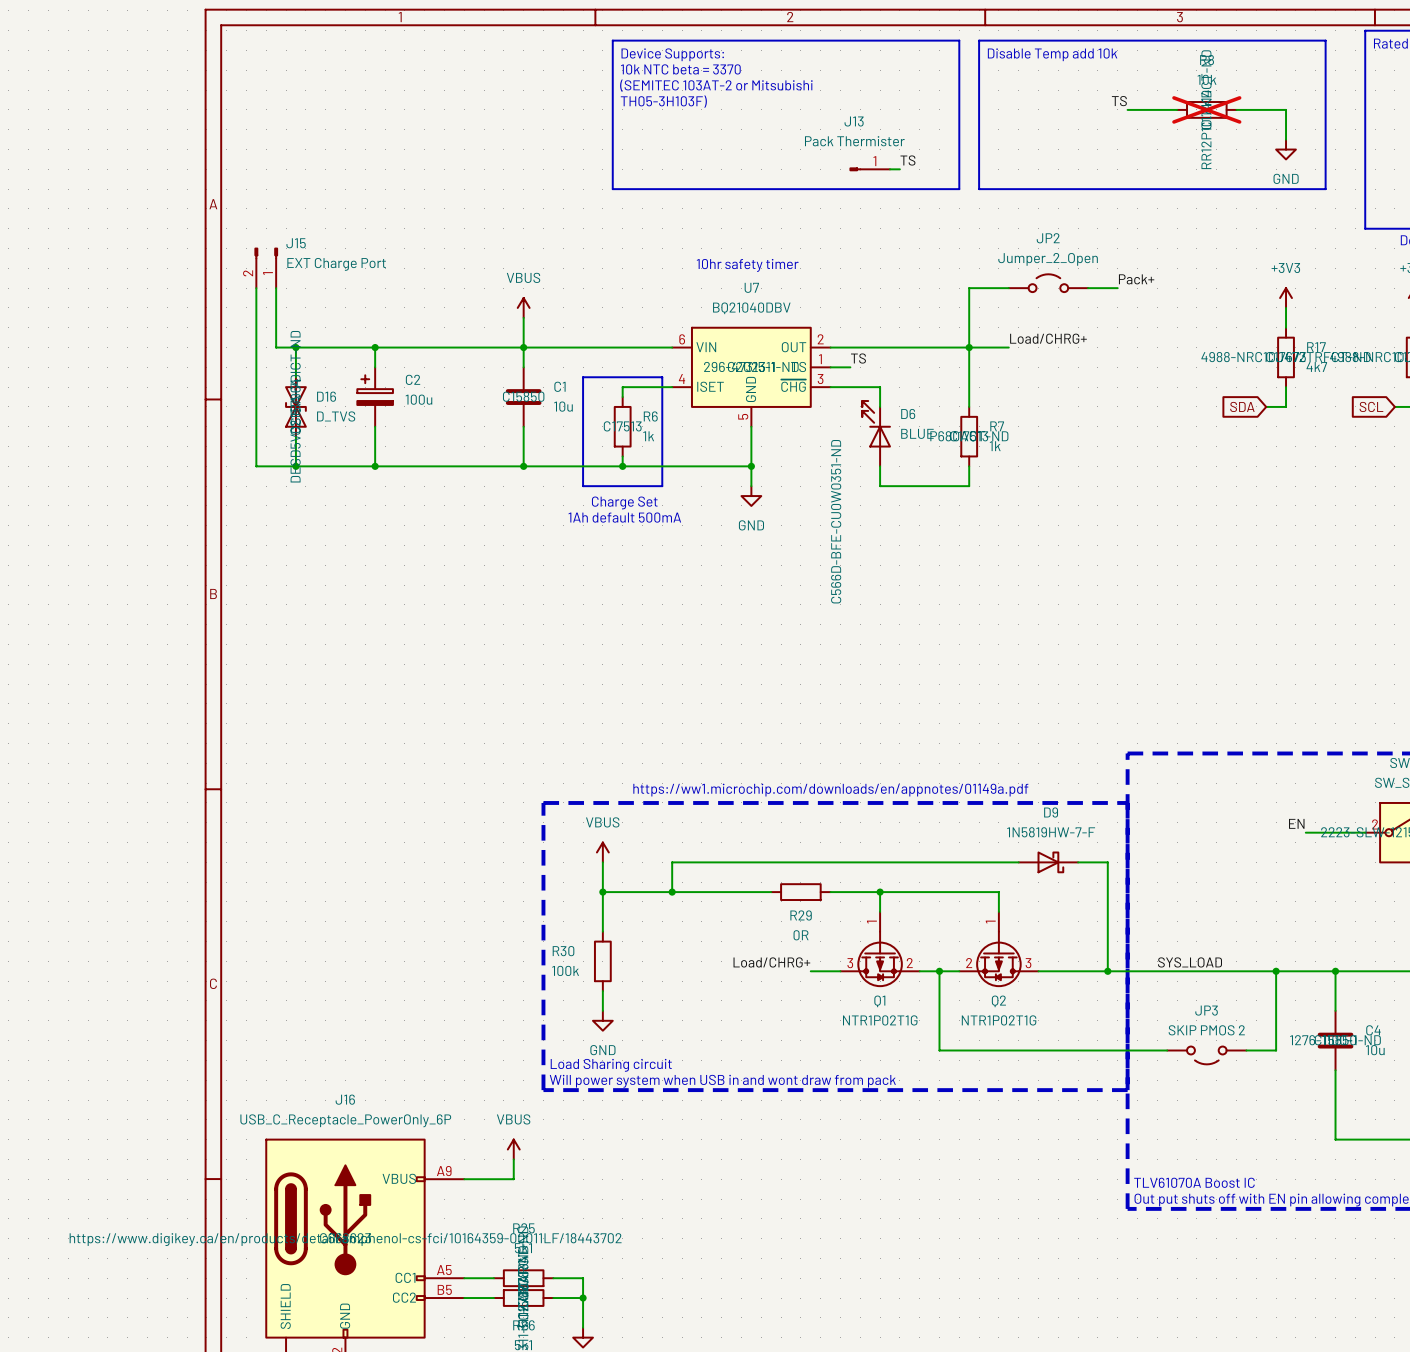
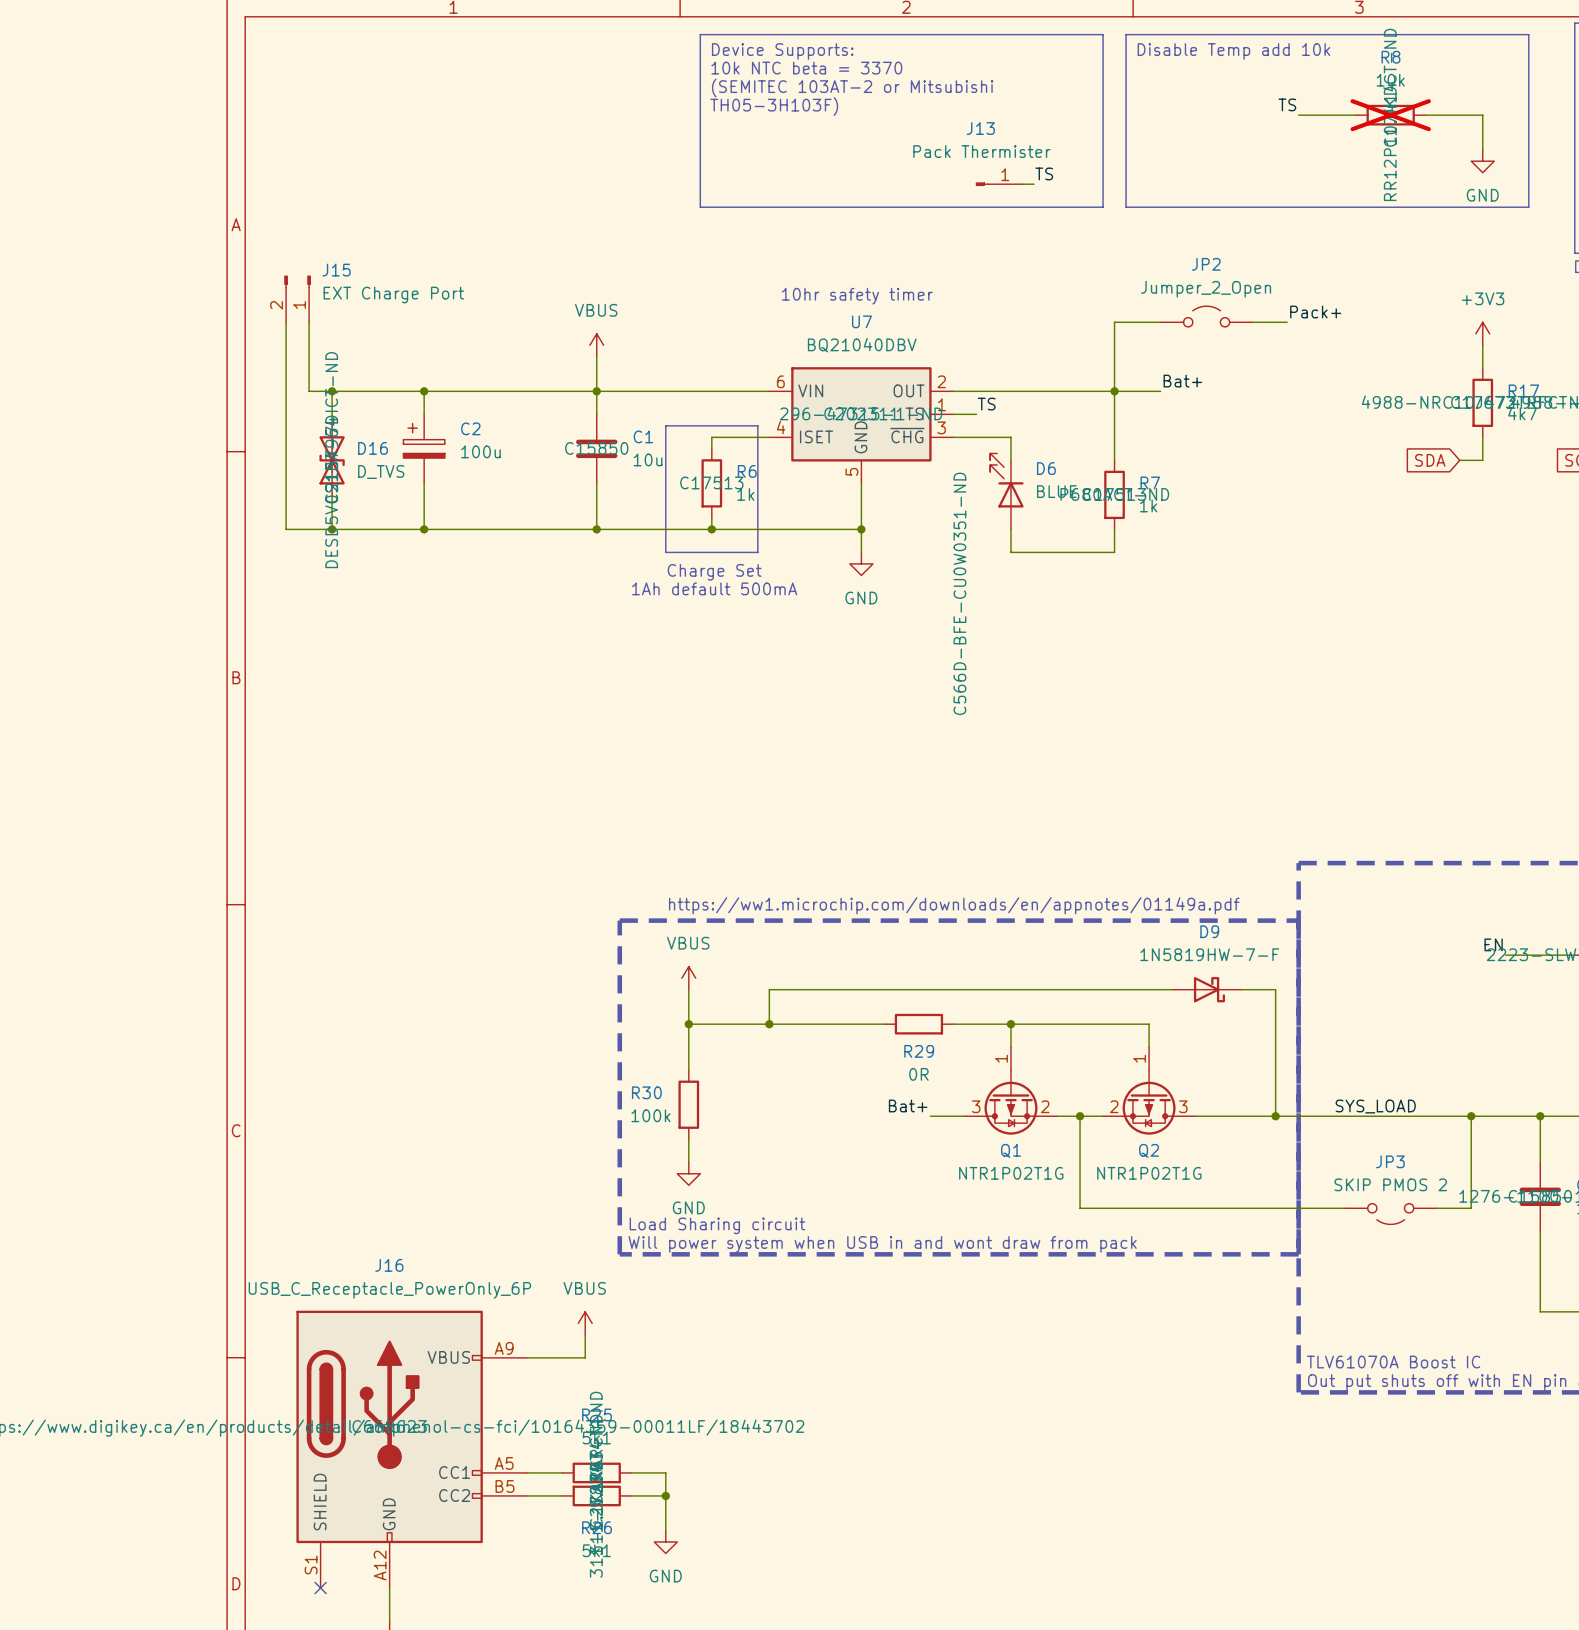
label: Load/CHRG+ (1048, 338) -> Bat+ (1182, 381)
label: Load/CHRG+ (771, 962) -> Bat+ (908, 1105)

